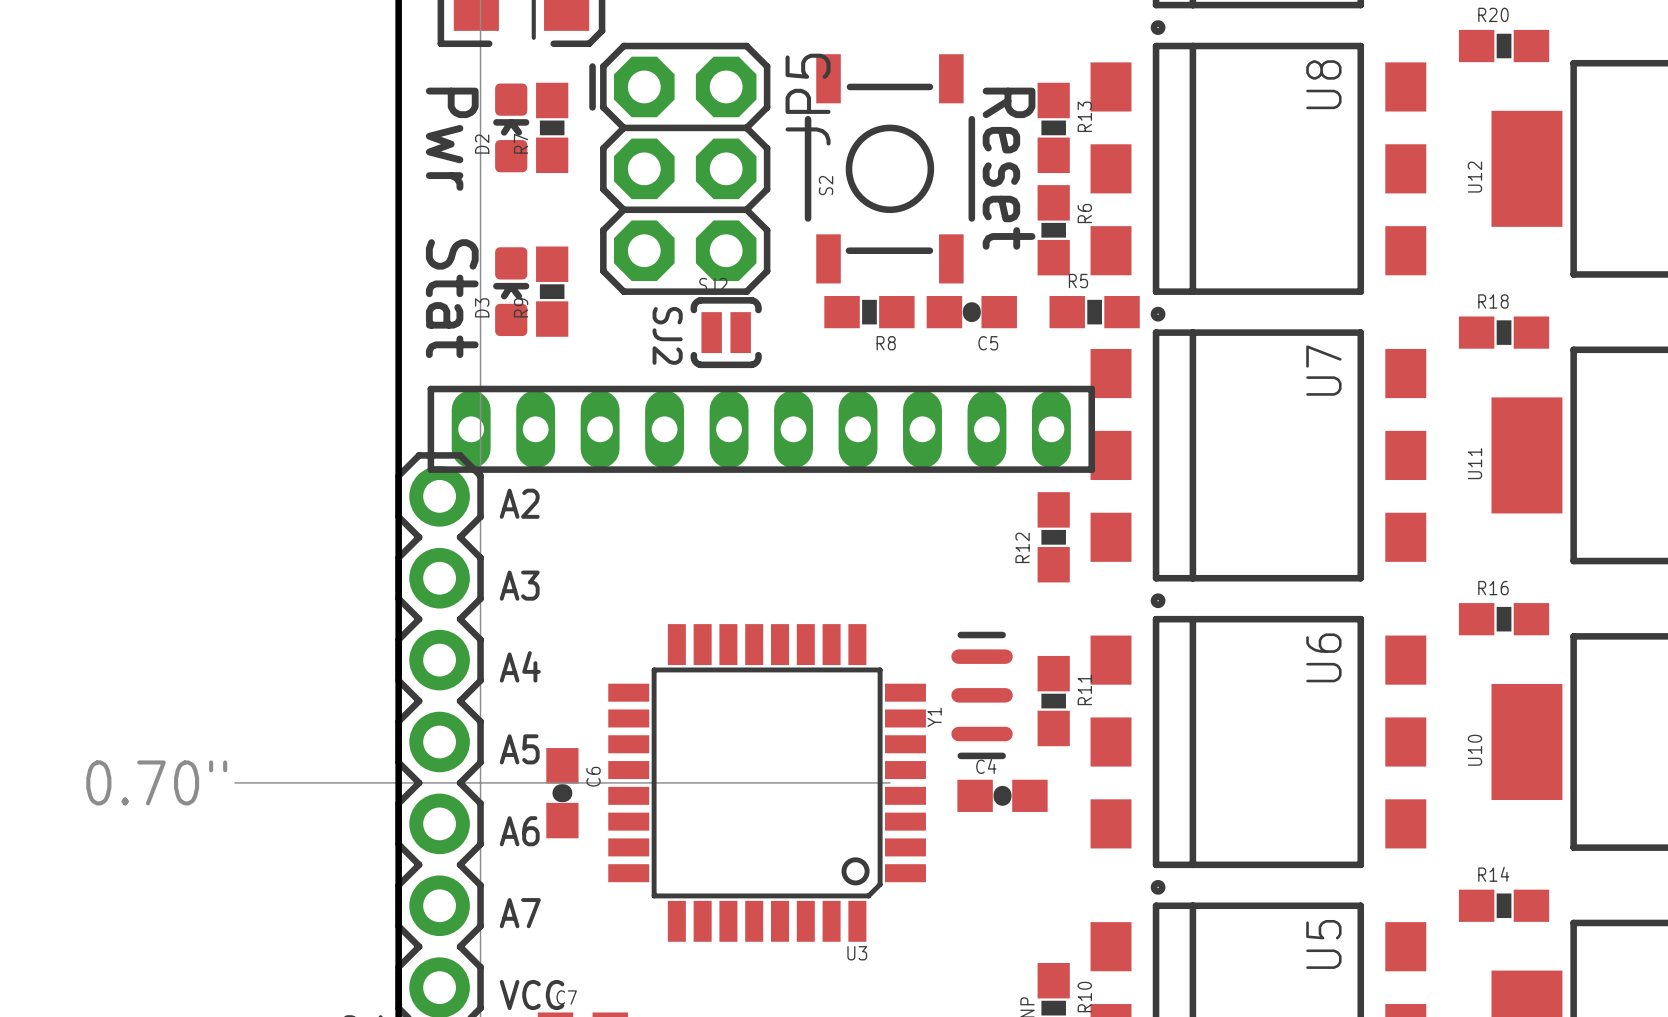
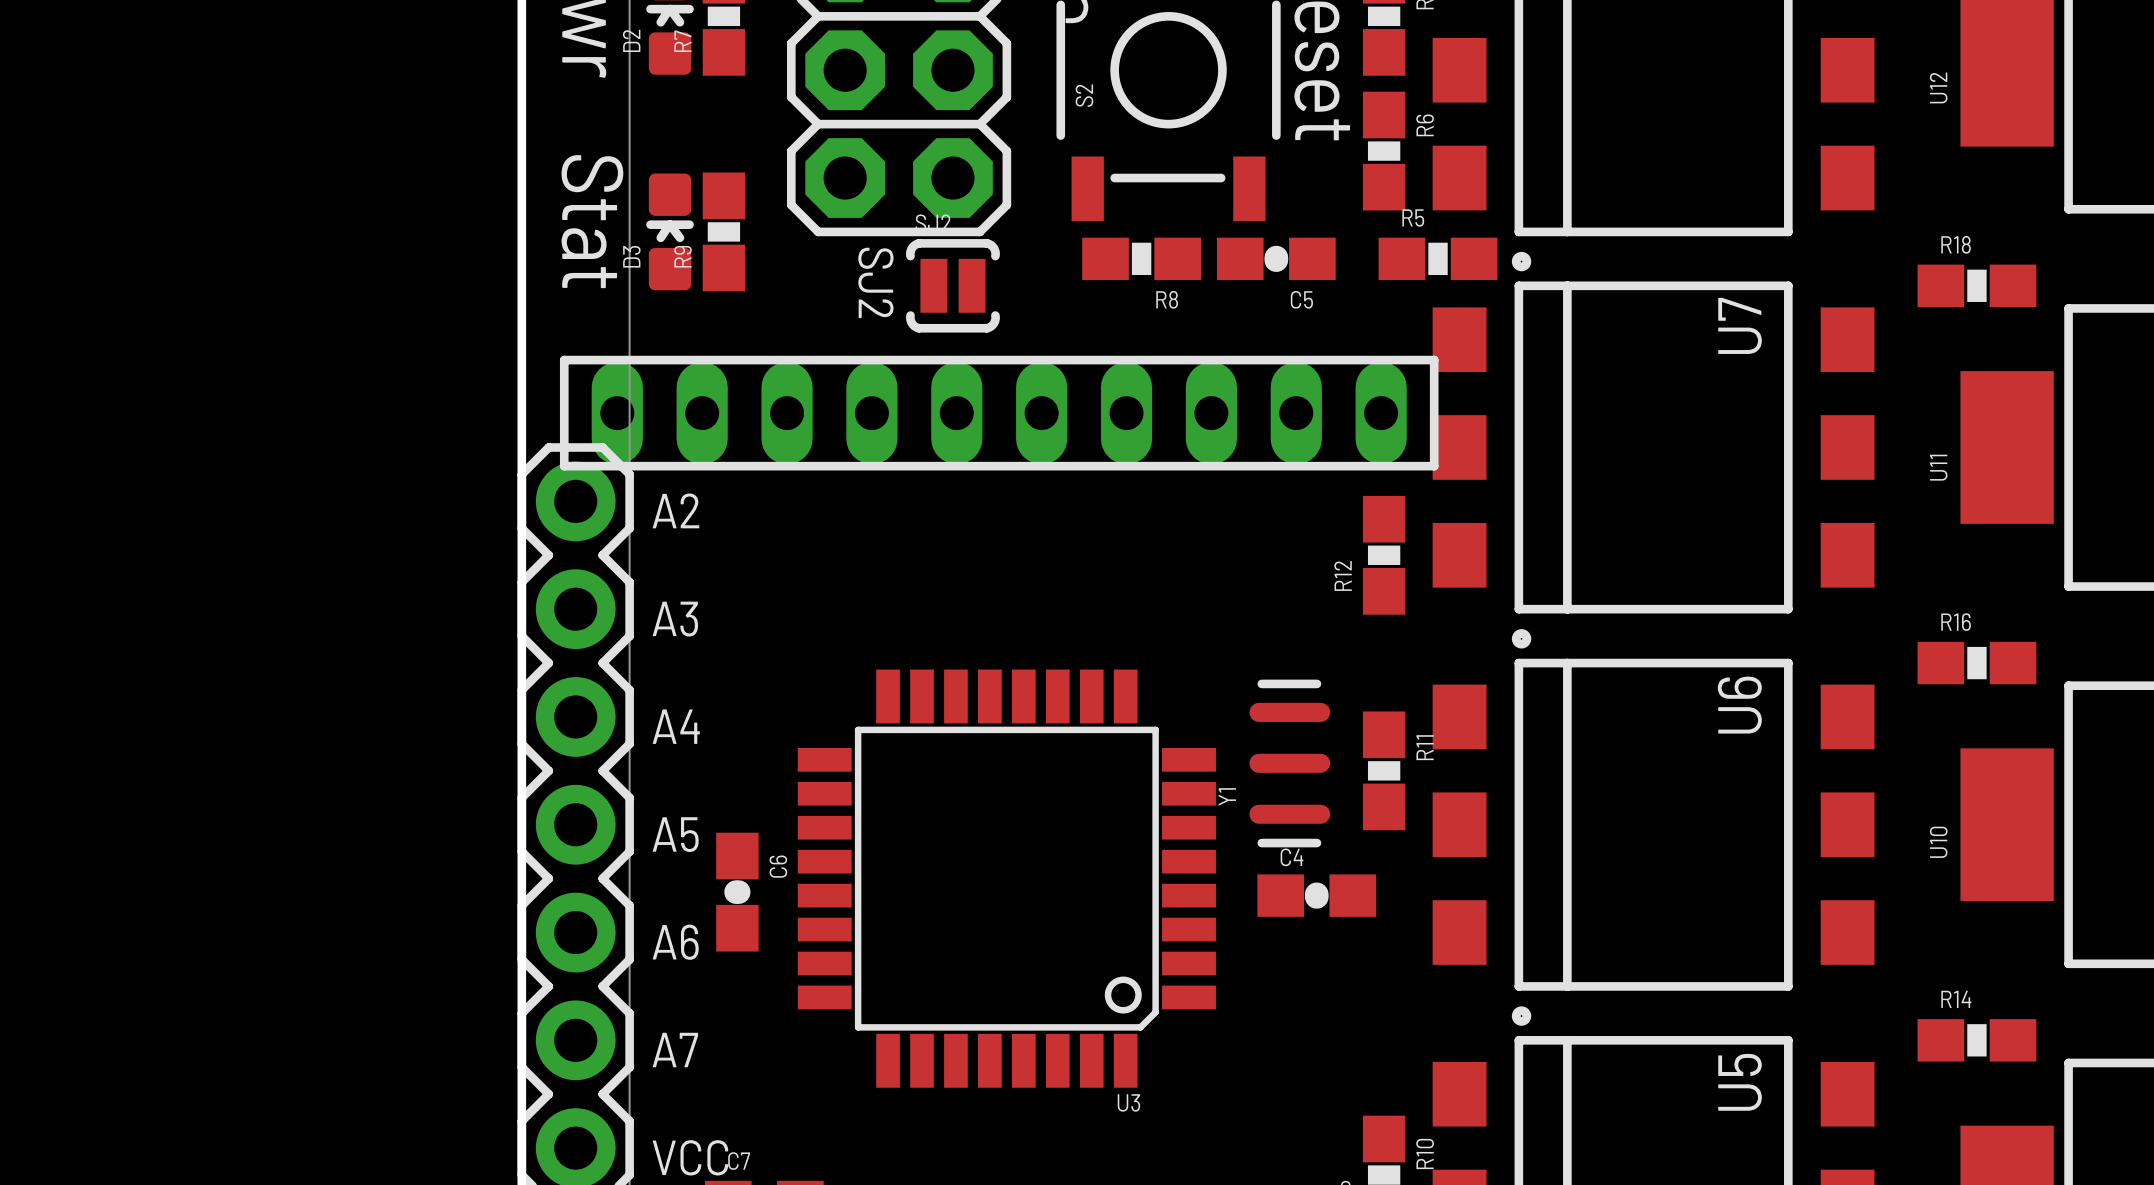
text: 0.70" (156, 782) -> none
line: (234, 782) (889, 782) -> none

